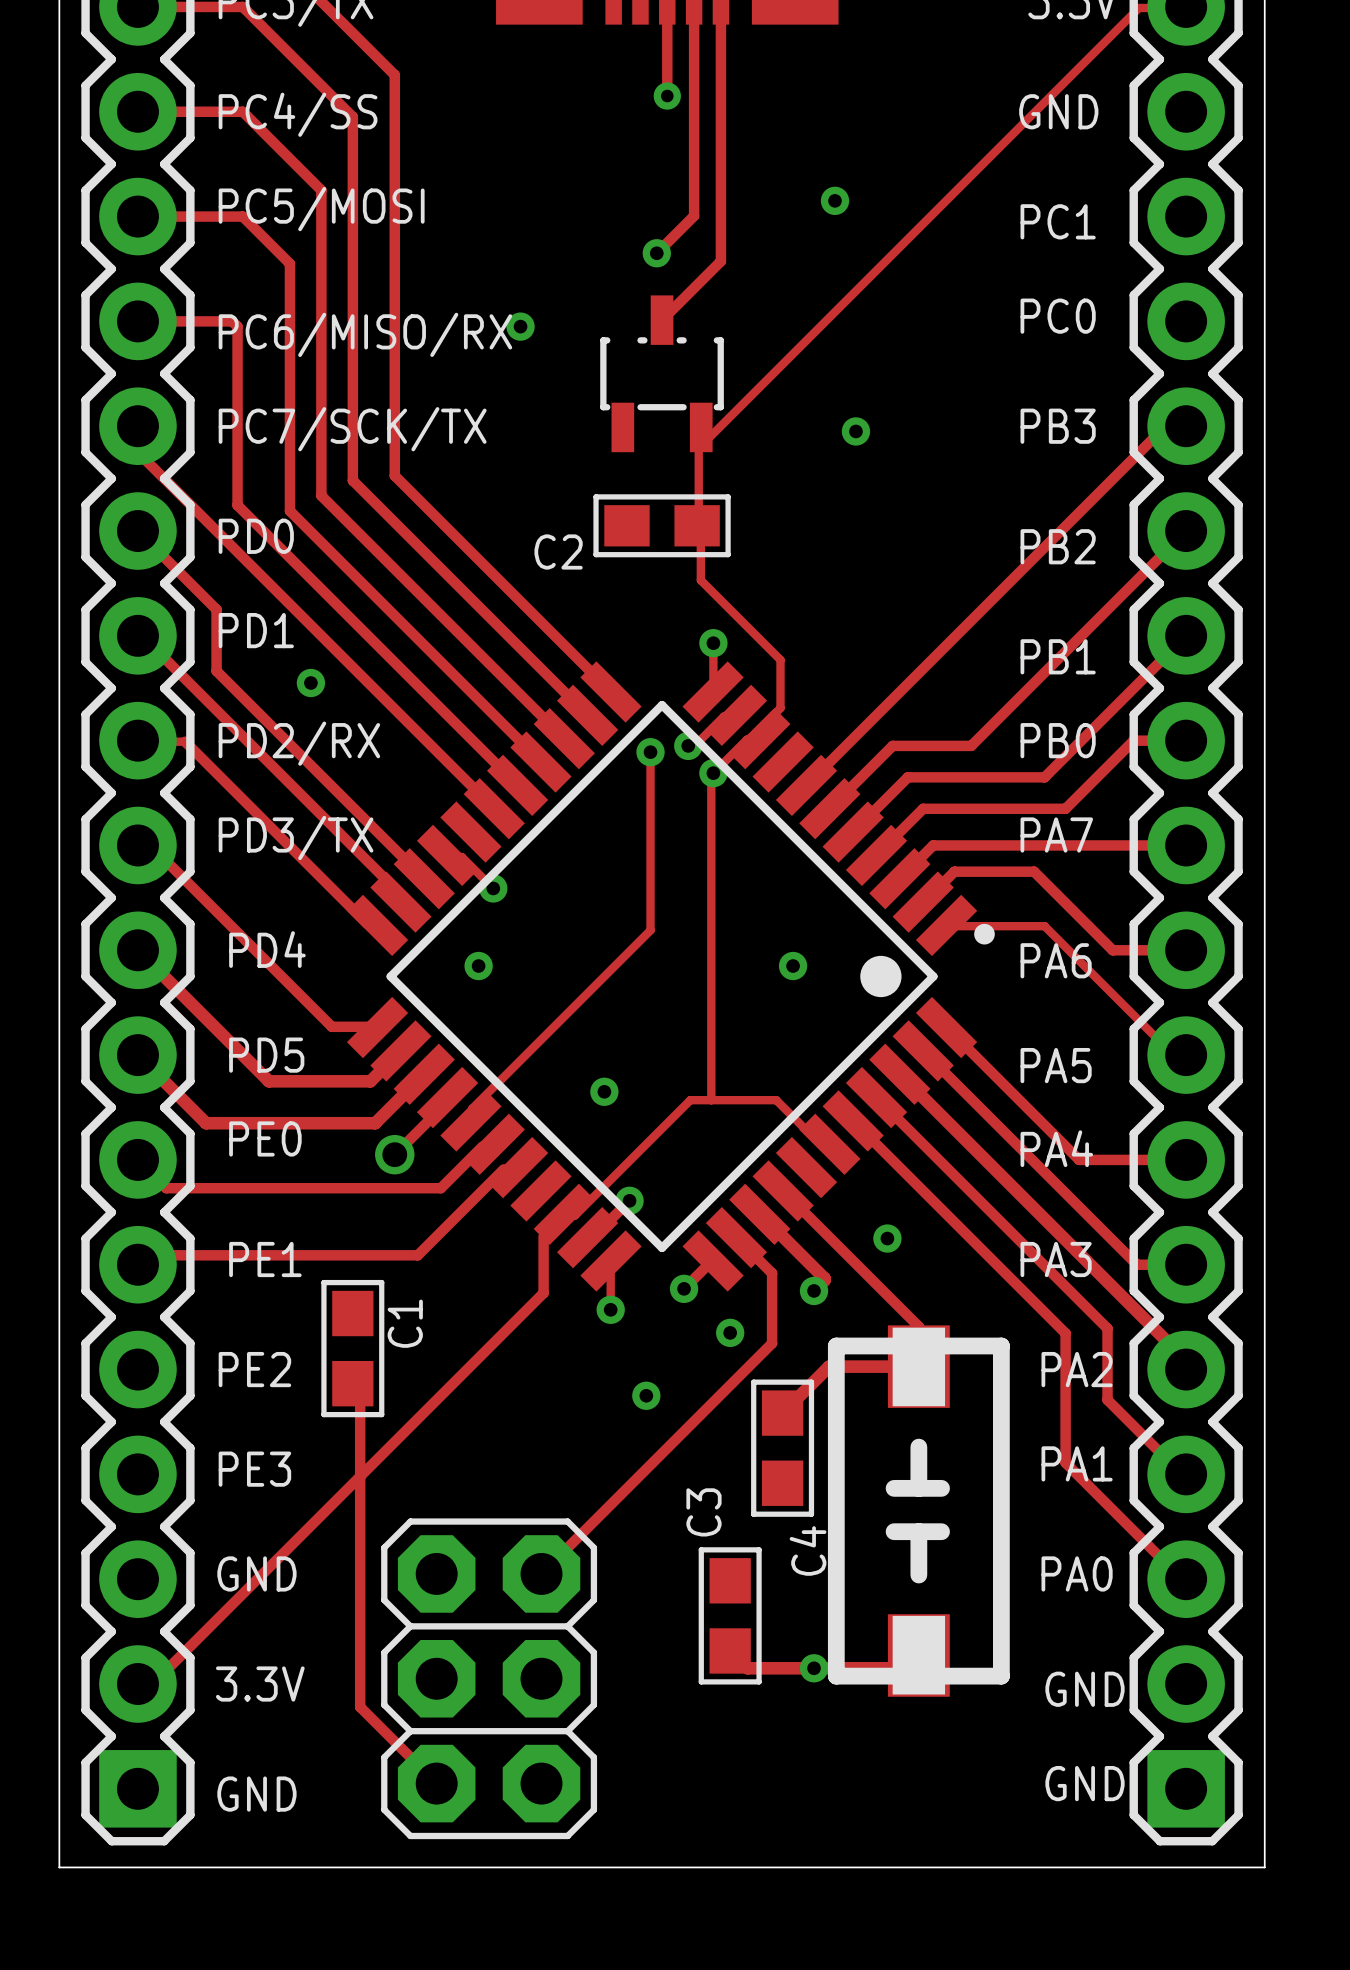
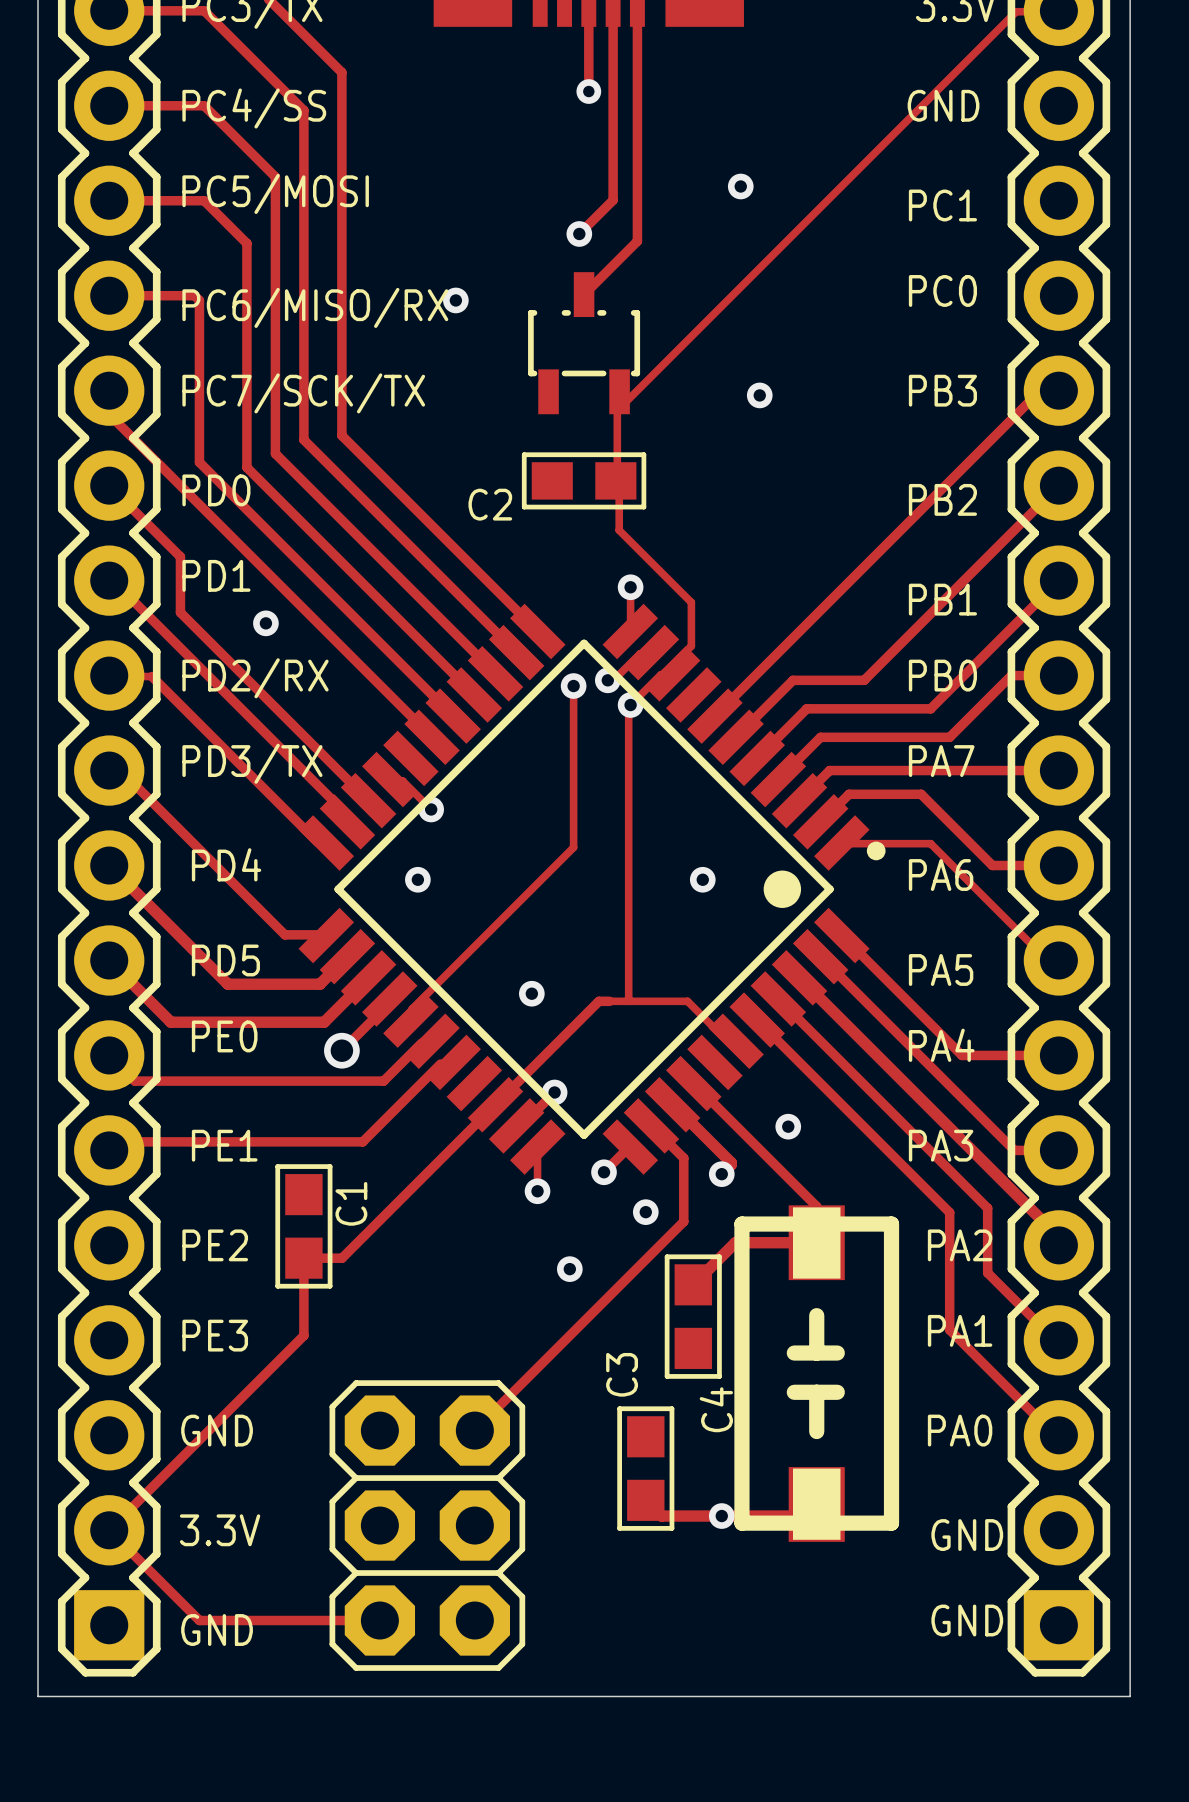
track: (690, 1100) (575, 1215) (564, 1214) (543, 1236) (543, 1293) (153, 1682) (139, 1682) -> (609, 1001) (598, 1001) (342, 1258) (303, 1258) (303, 1335) (109, 1530) (199, 1620) (379, 1620)
track: (352, 1383) (360, 1391) (360, 1707) (436, 1783) -> none

